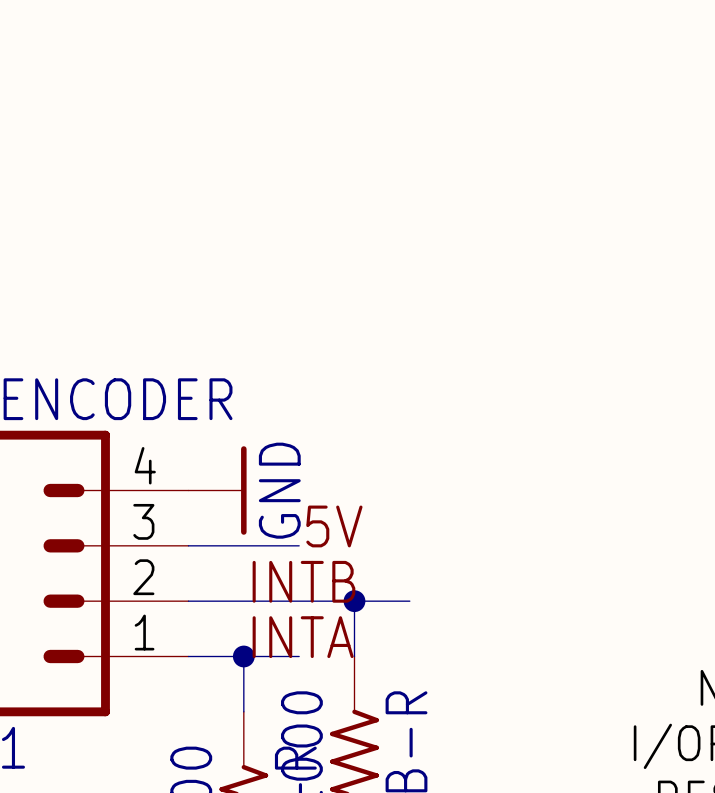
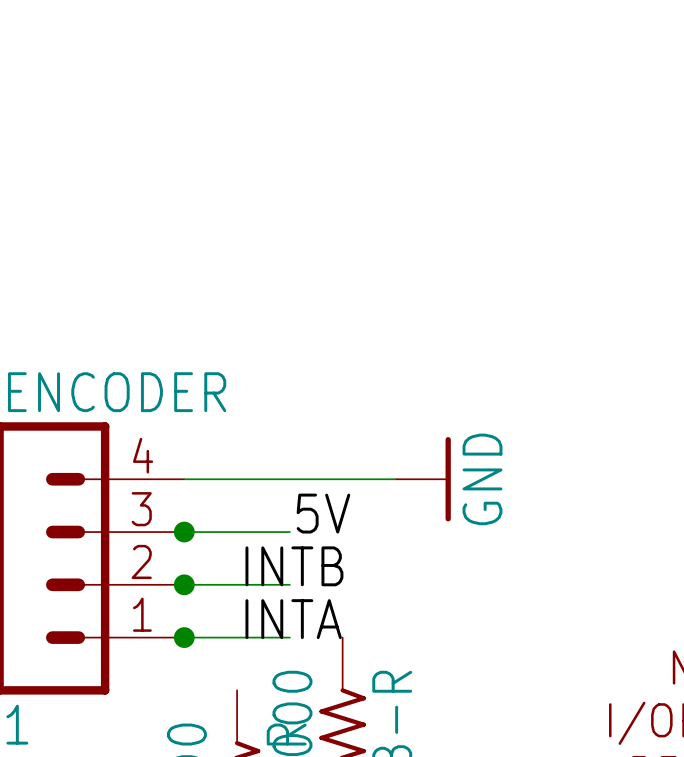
wire: none -> (184, 479) (395, 479)
power symbol position: GND (217, 490) -> GND (423, 479)
junction: none -> (184, 532)
junction: none -> (184, 584)
wire: (299, 601) (409, 601) -> none
wire: (354, 601) (354, 656) -> none
junction: (354, 601) -> none
junction: none -> (184, 637)
wire: (243, 656) (243, 711) -> none
junction: (243, 656) -> none

